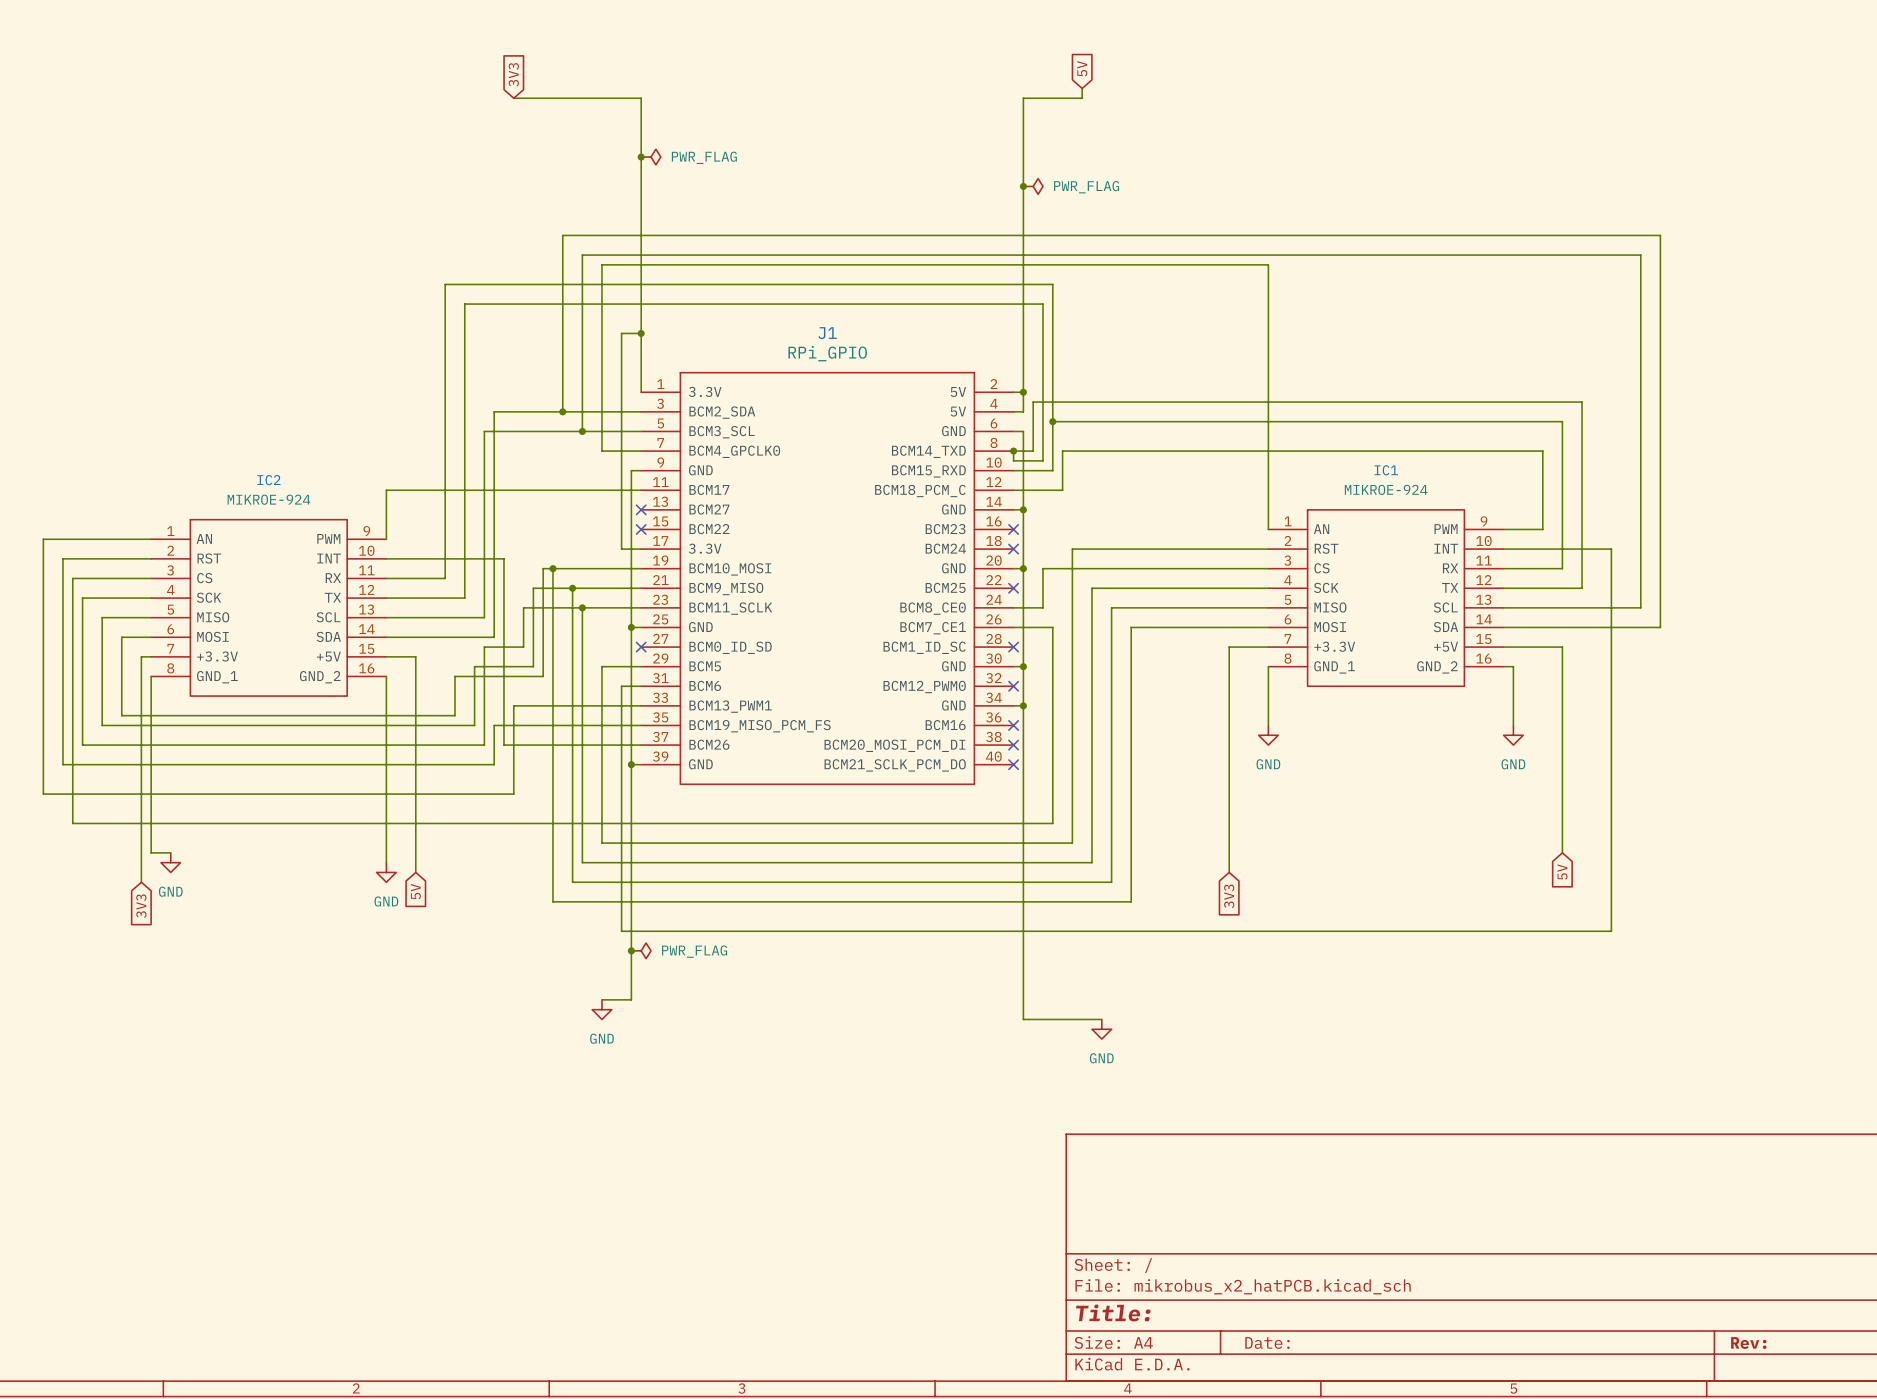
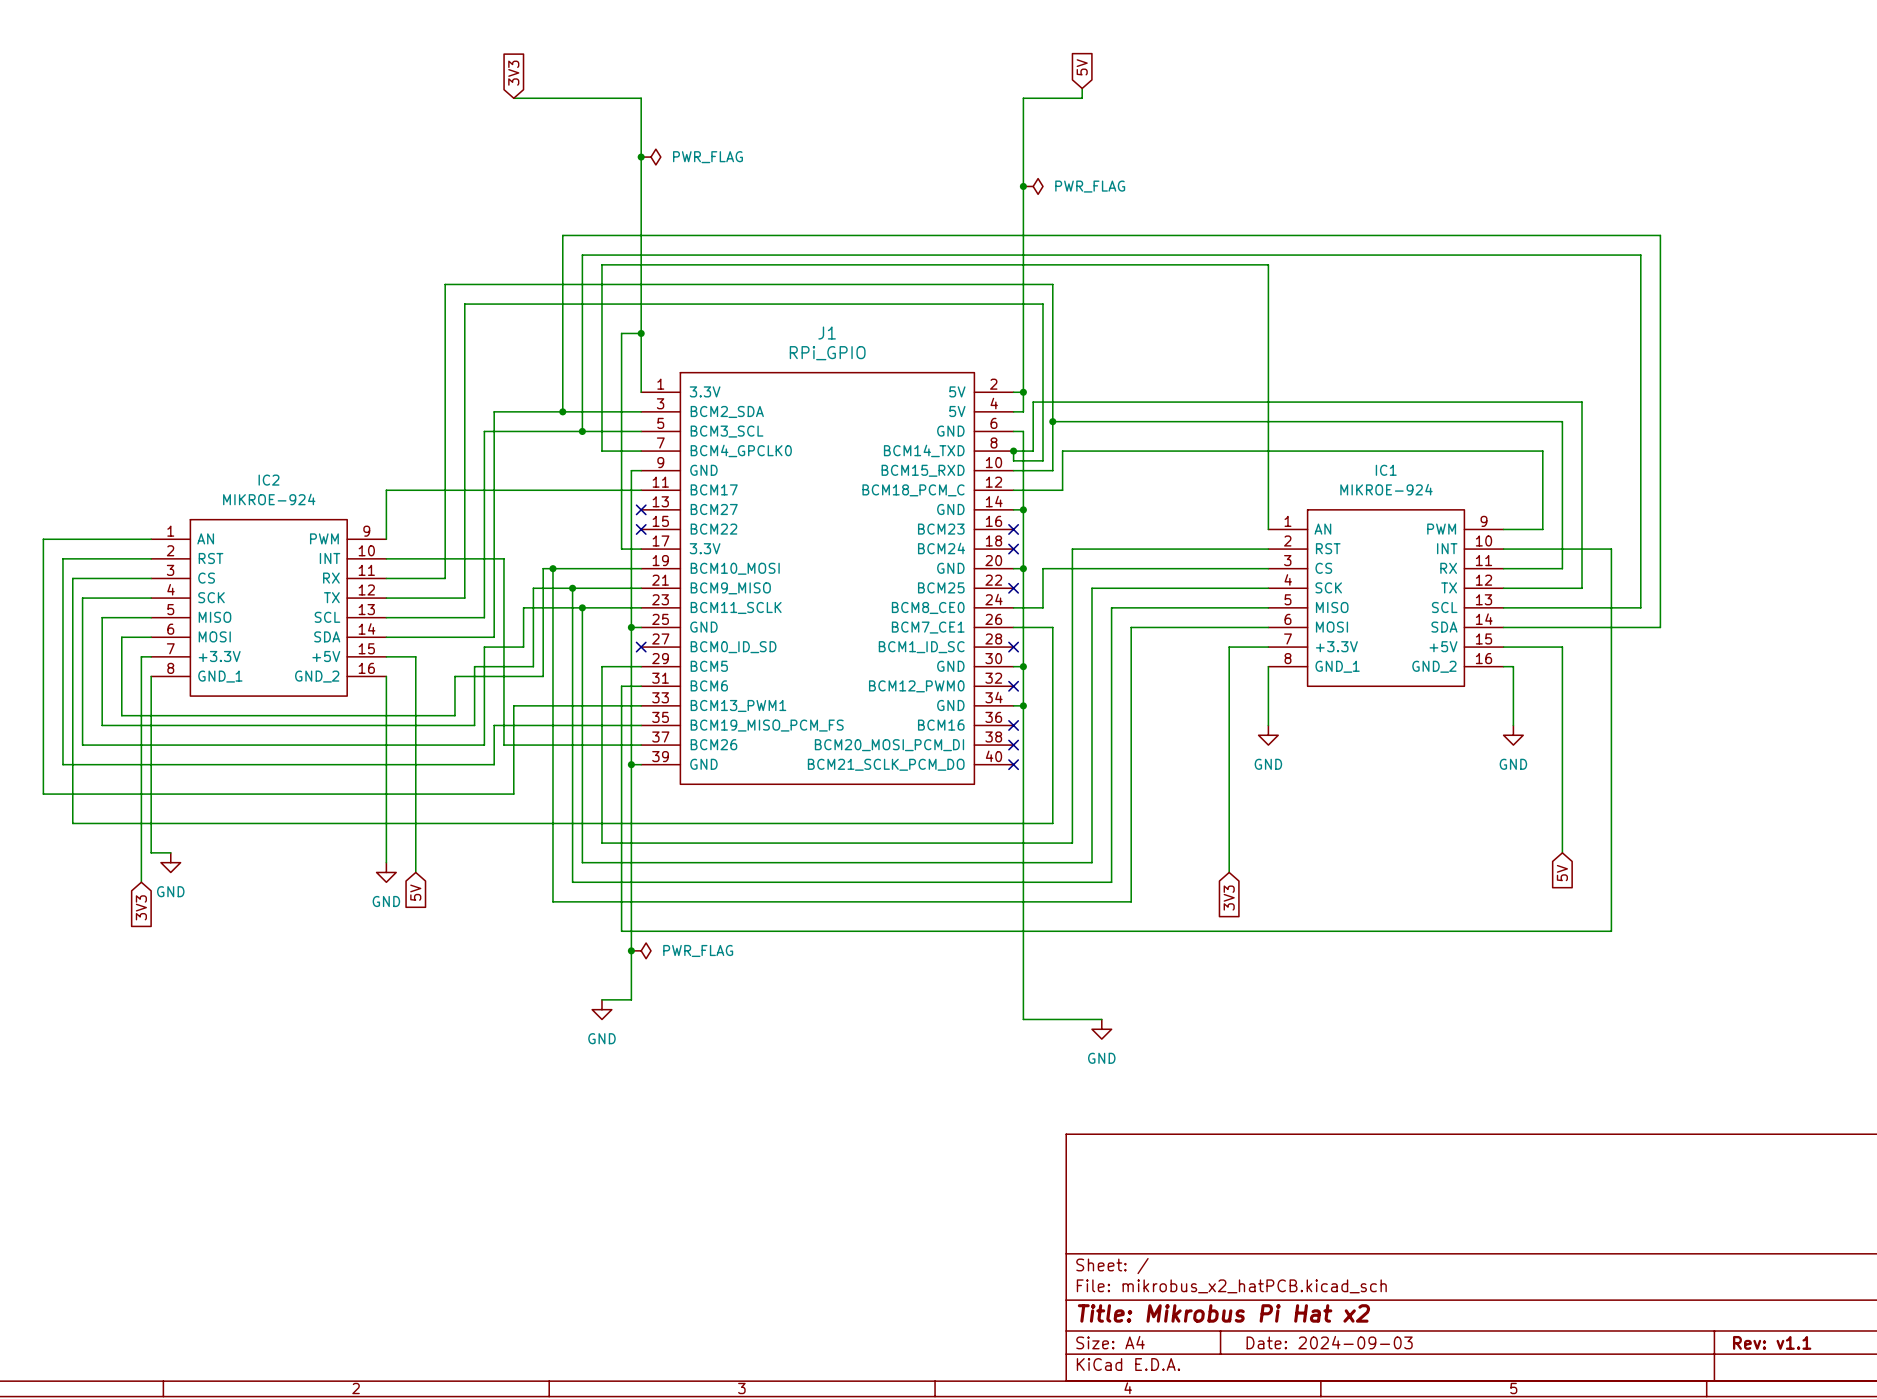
title block: Title: (1113, 1312) -> Title: Mikrobus Pi Hat x2 (1223, 1313)
title block: Date: (1267, 1343) -> Date: 2024-09-03 (1329, 1342)
title block: Rev: (1748, 1343) -> Rev: v1.1 (1772, 1342)

